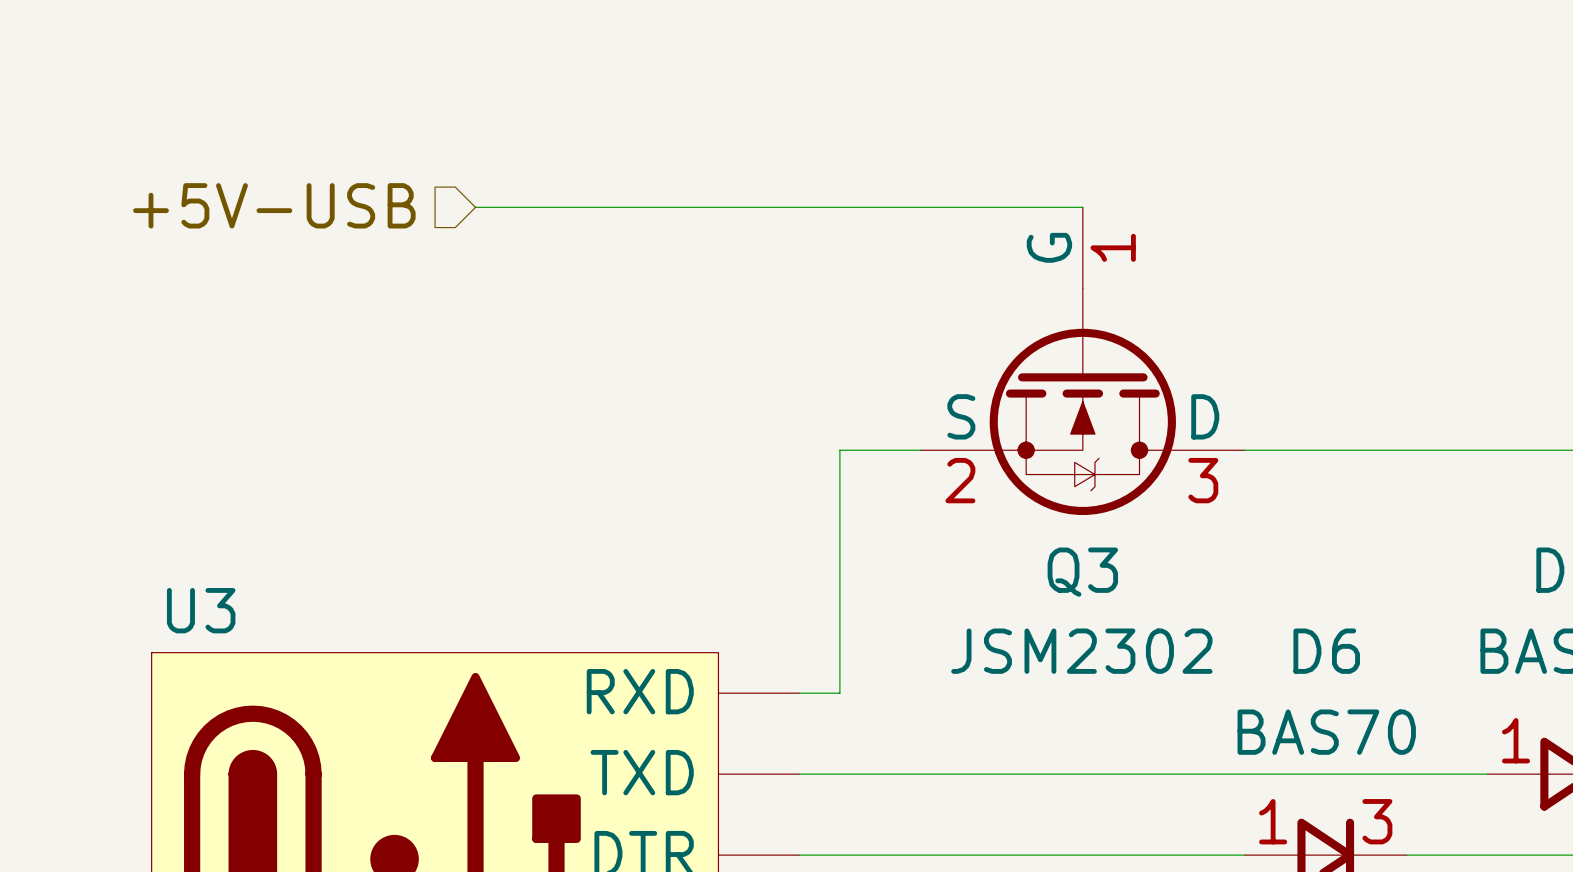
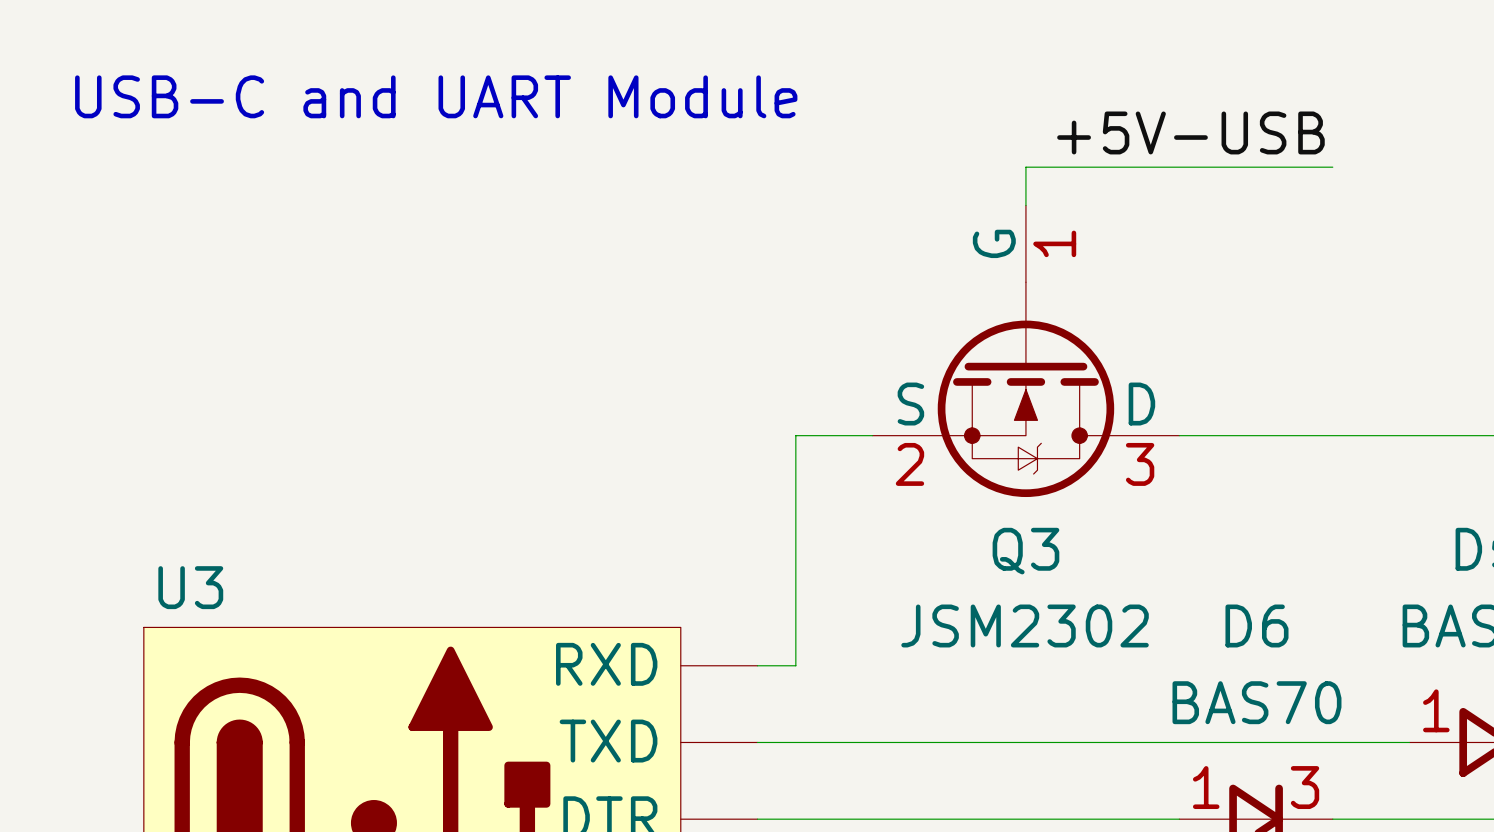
text: none -> USB-C and UART Module (436, 96)
label: none -> +5V-USB (1190, 132)
hierarchical label: +5V-USB (274, 205) -> none
wire: (475, 207) (1082, 207) -> (1332, 167) (1025, 167) (1025, 205)

